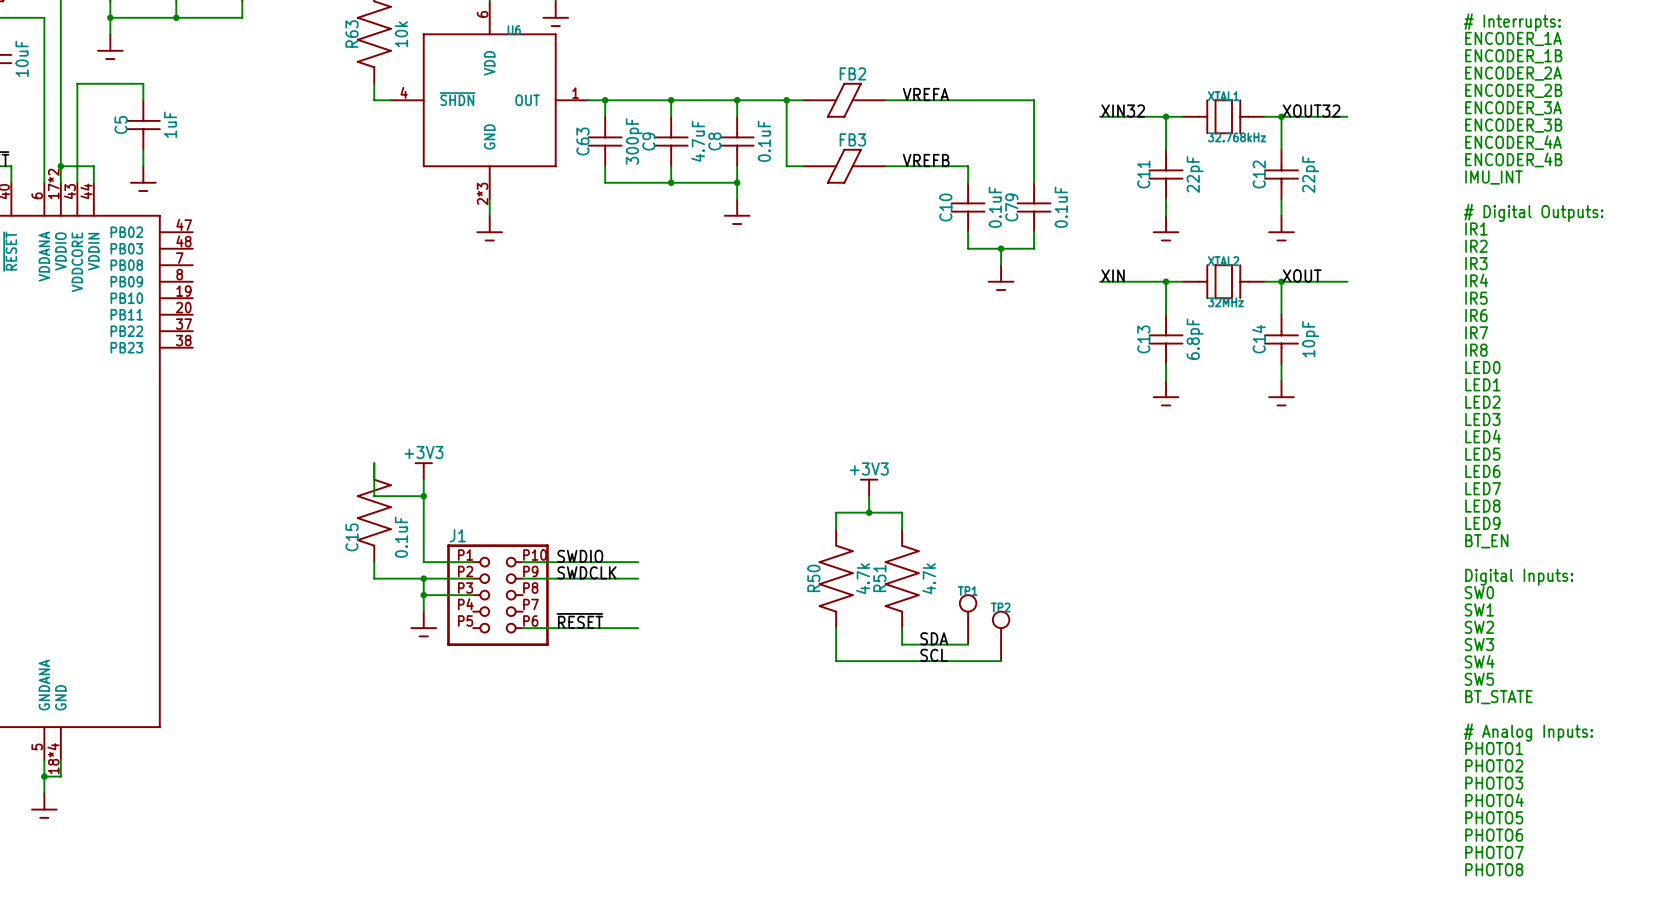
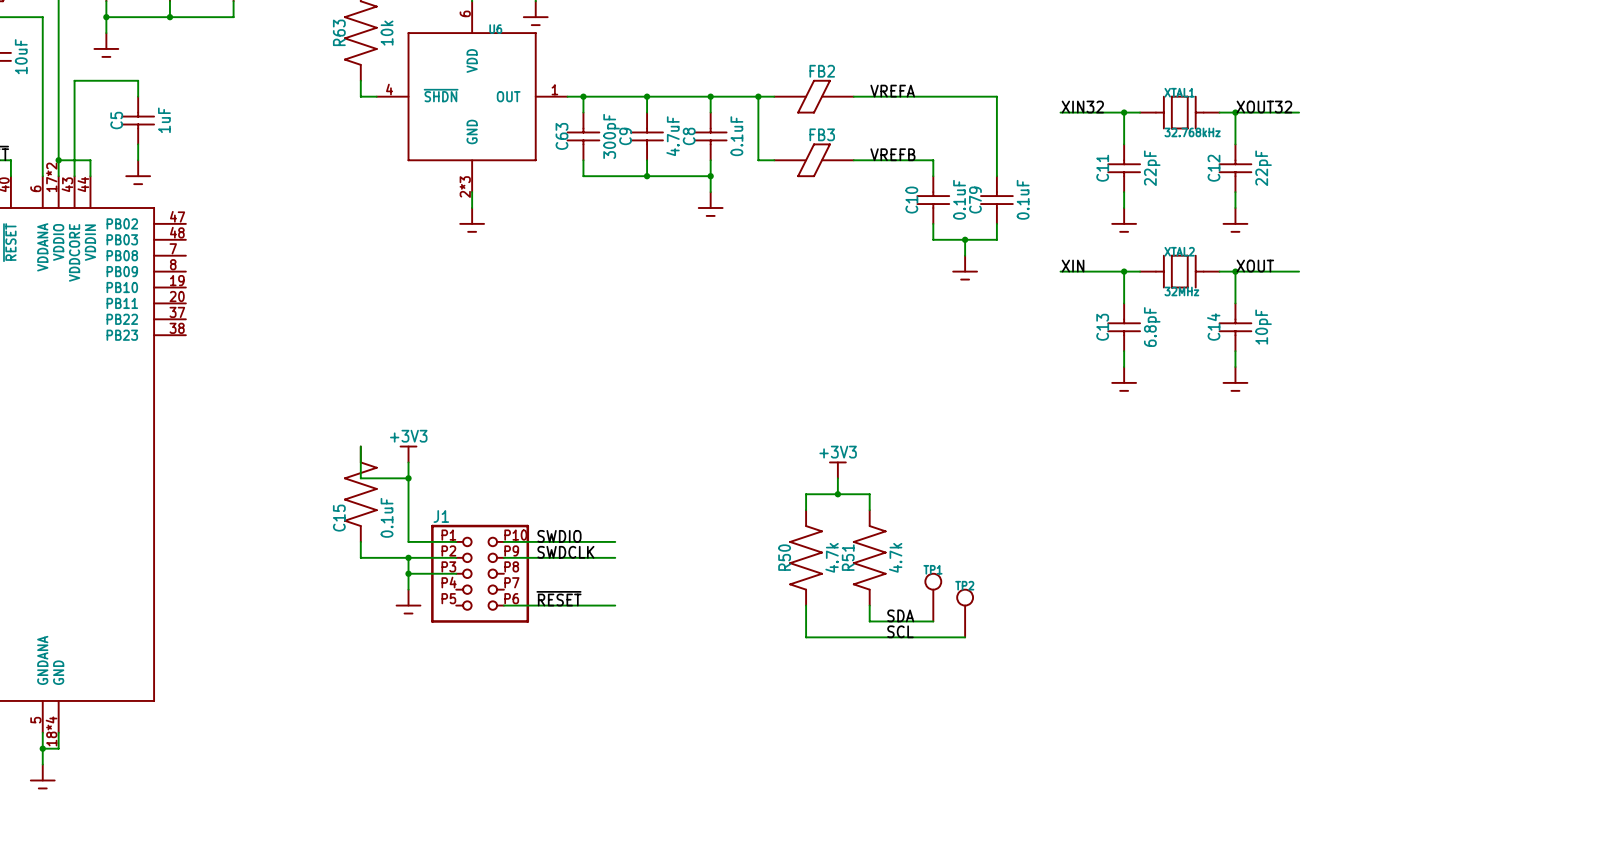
text: # Interrupts: (1512, 22) -> none
text: ENCODER_1A (1513, 38) -> none
text: ENCODER_1B (1513, 56) -> none
text: ENCODER_2A (1513, 73) -> none
text: ENCODER_2B (1513, 90) -> none
text: ENCODER_3A (1513, 108) -> none
text: ENCODER_3B (1513, 125) -> none
text: ENCODER_4A (1513, 142) -> none
text: ENCODER_4B (1513, 159) -> none
text: IMU_INT (1493, 177) -> none
text: # Digital Outputs: (1533, 213) -> none
text: IR1 (1476, 228) -> none
text: IR2 (1476, 246) -> none
text: IR3 (1476, 263) -> none
text: IR4 (1476, 280) -> none
text: IR5 (1476, 298) -> none
text: IR6 (1476, 315) -> none
text: IR7 (1476, 332) -> none
text: IR8 (1476, 350) -> none
text: LED0 (1482, 367) -> none
text: LED1 (1482, 384) -> none
text: LED2 (1482, 402) -> none
text: LED3 (1482, 419) -> none
text: LED4 (1483, 436) -> none
text: LED5 (1482, 454) -> none
text: LED6 (1482, 471) -> none
text: LED7 (1483, 488) -> none
text: LED8 (1482, 506) -> none
text: LED9 (1482, 523) -> none
text: BT_EN (1486, 541) -> none
text: Digital Inputs: (1519, 577) -> none
text: SW0 (1479, 592) -> none
text: SW1 (1479, 609) -> none
text: SW2 (1479, 627) -> none
text: SW3 (1479, 644) -> none
text: SW4 (1479, 661) -> none
text: SW5 (1479, 679) -> none
text: BT_STATE (1498, 697) -> none
text: # Analog Inputs: (1528, 732) -> none
text: PHOTO1 (1494, 748) -> none
text: PHOTO2 (1494, 765) -> none
text: PHOTO3 (1494, 783) -> none
text: PHOTO4 (1494, 800) -> none
text: PHOTO5 (1494, 817) -> none
text: PHOTO6 (1494, 835) -> none
text: PHOTO7 (1494, 852) -> none
text: PHOTO8 (1494, 869) -> none

